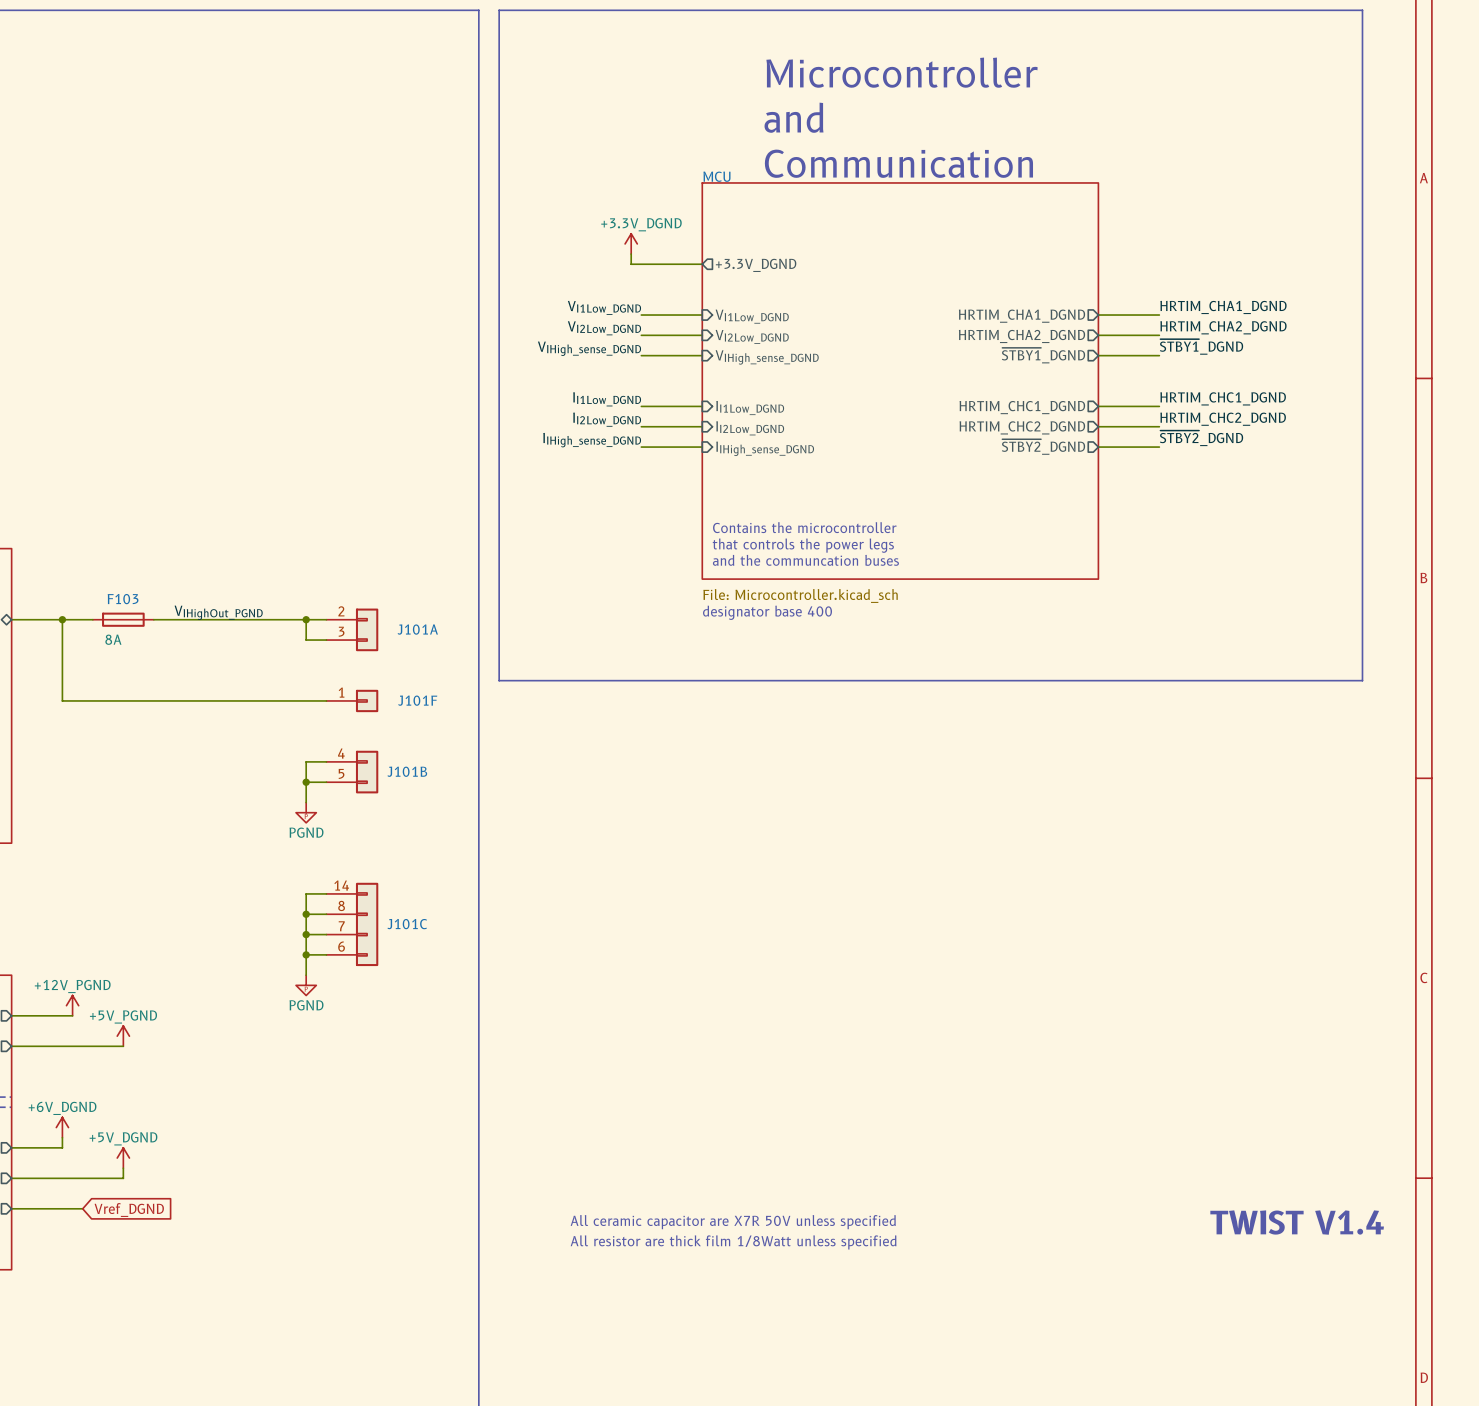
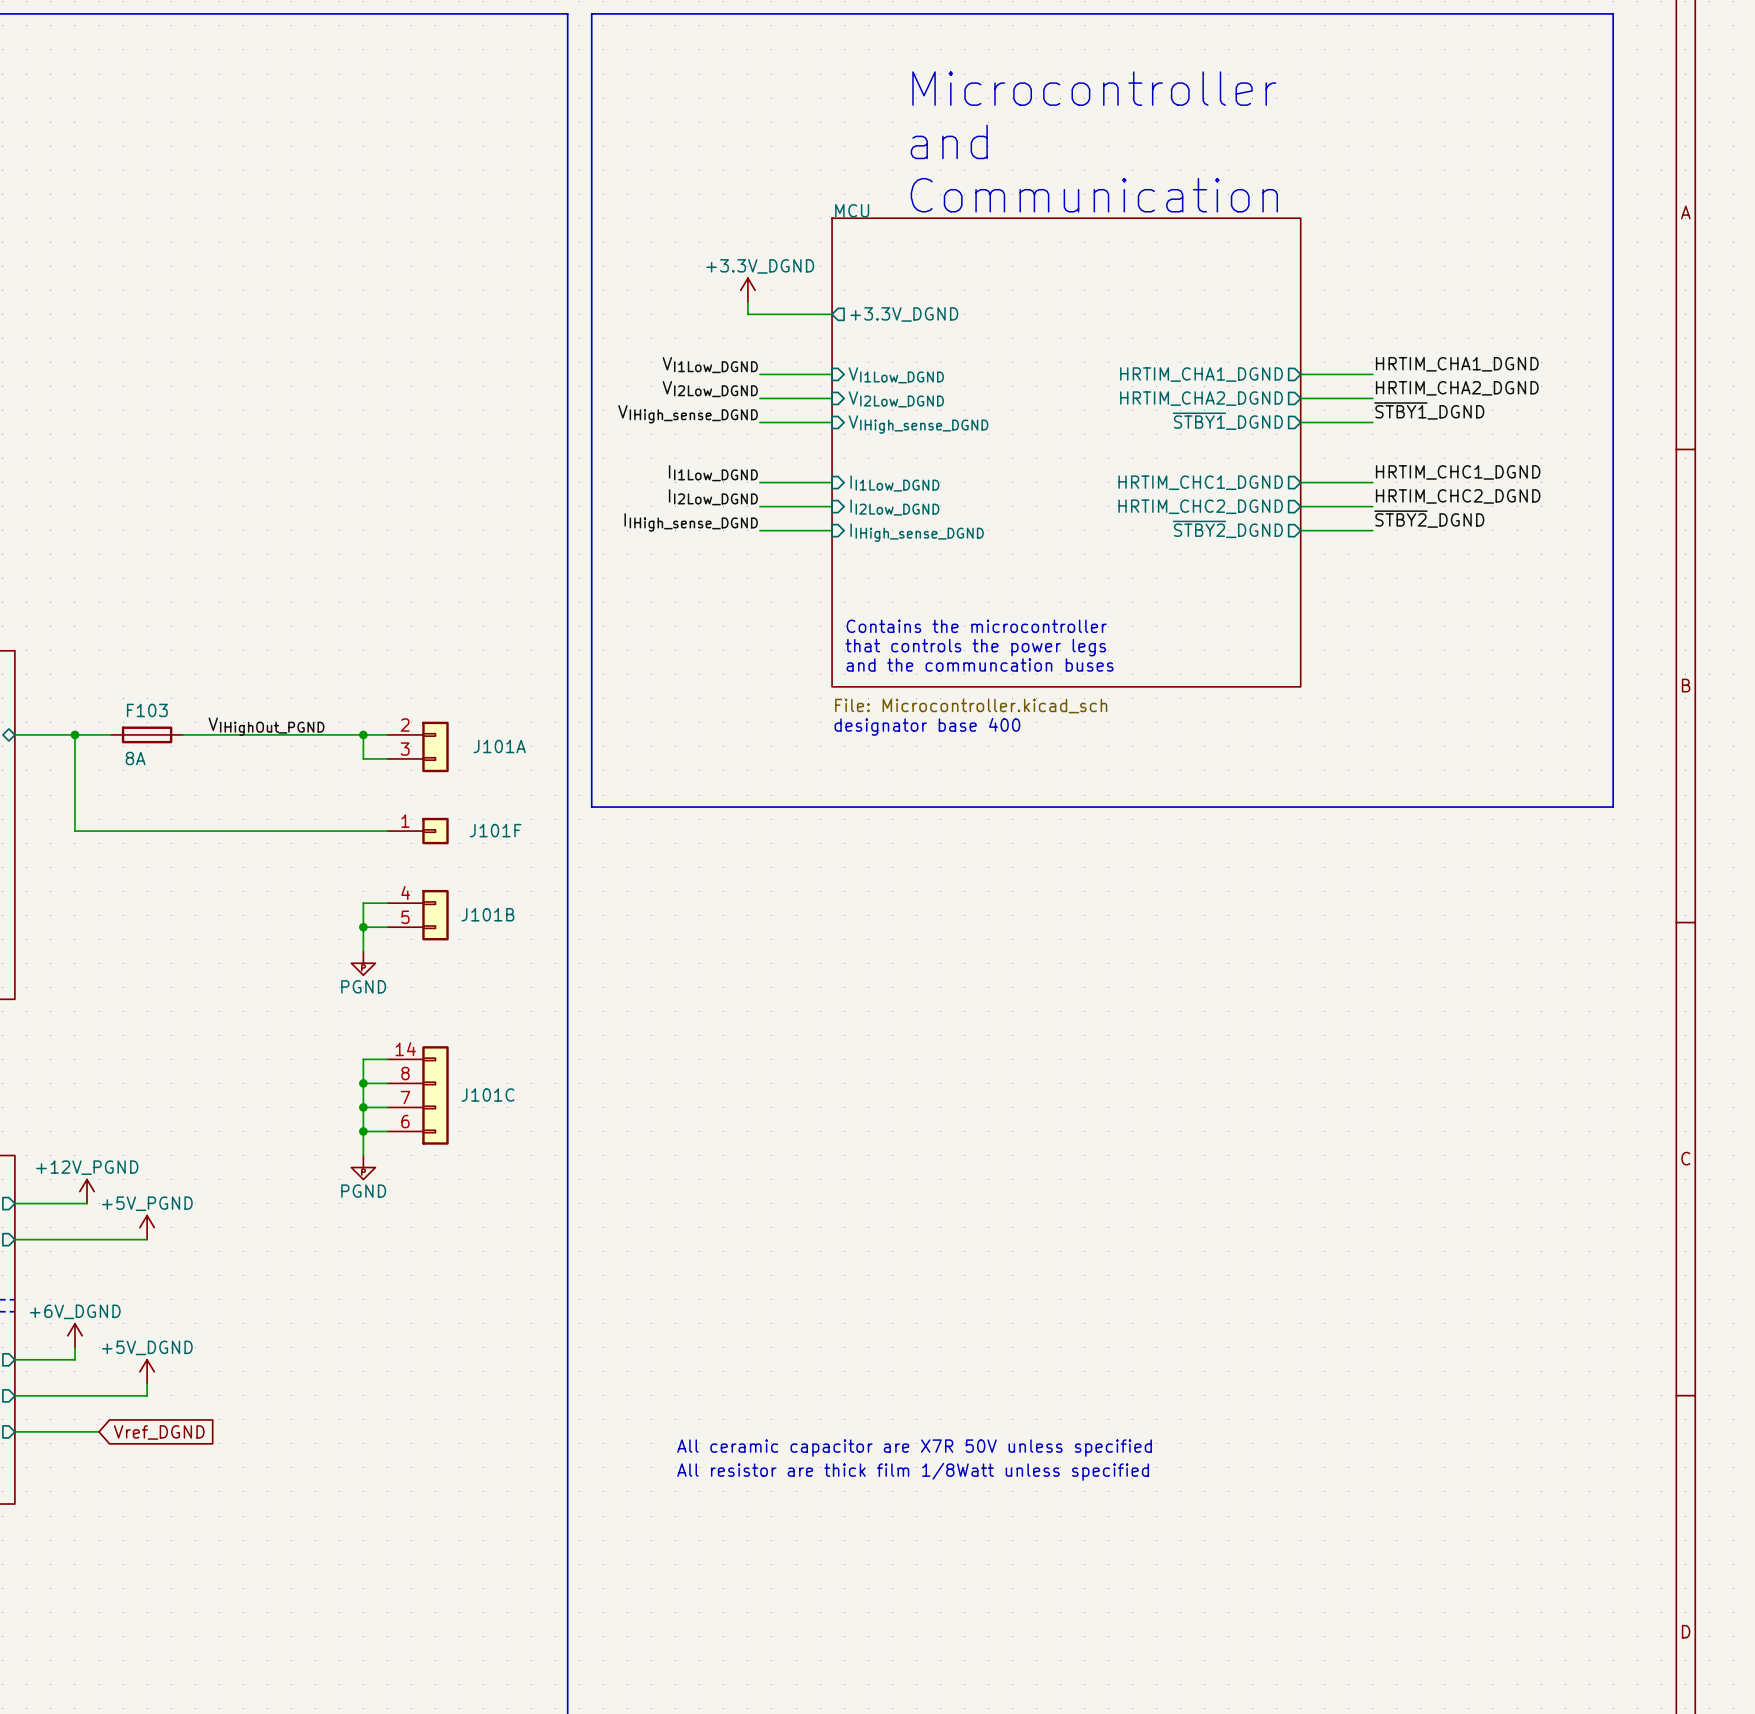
text: TWIST V1.4 (1297, 1222) -> none

